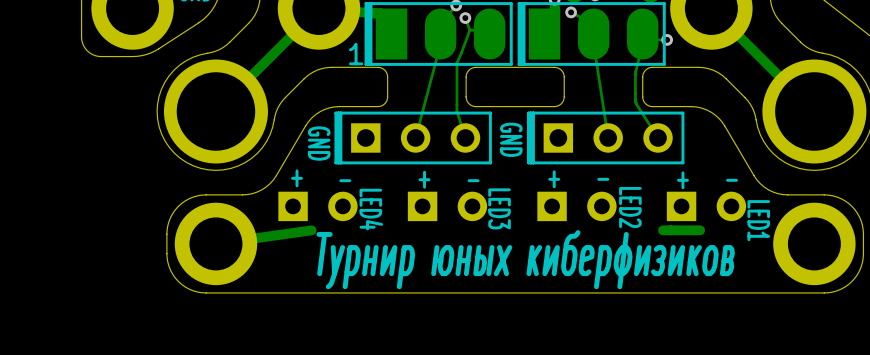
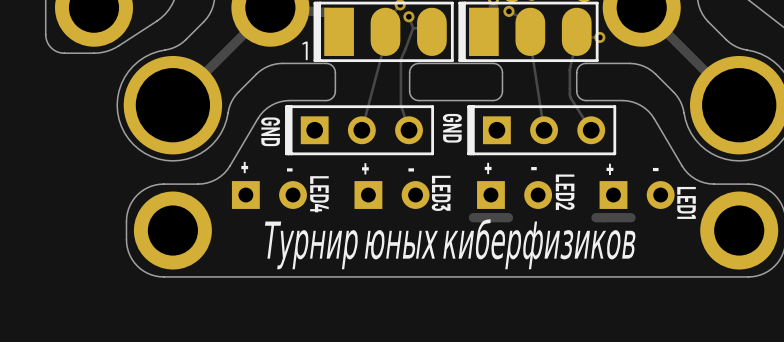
track: (311, 230) (215, 243) -> none
track: none -> (508, 217) (473, 217)

